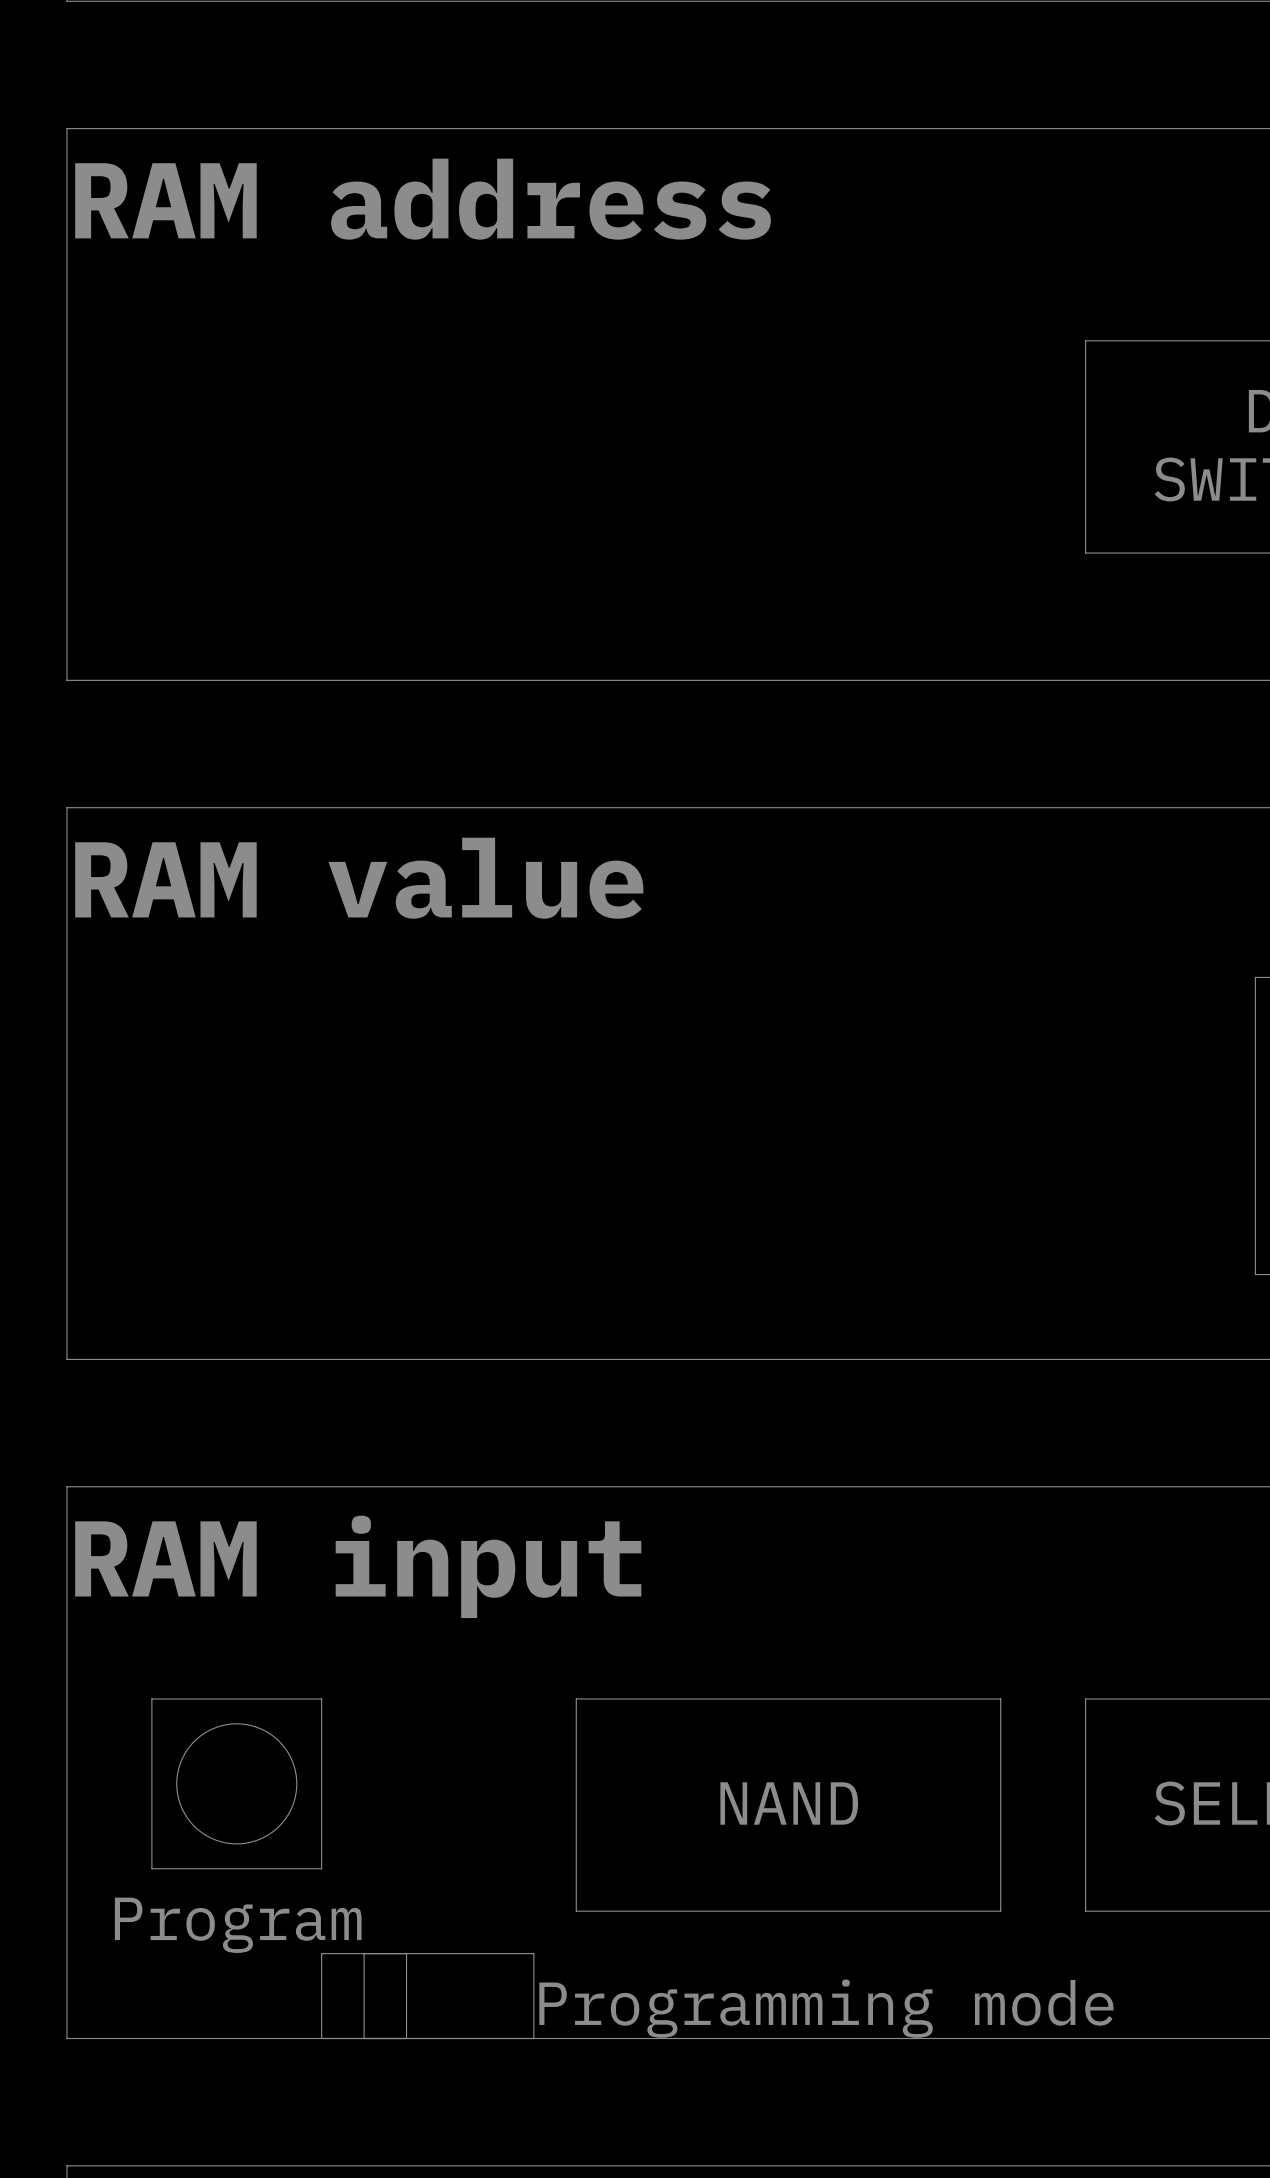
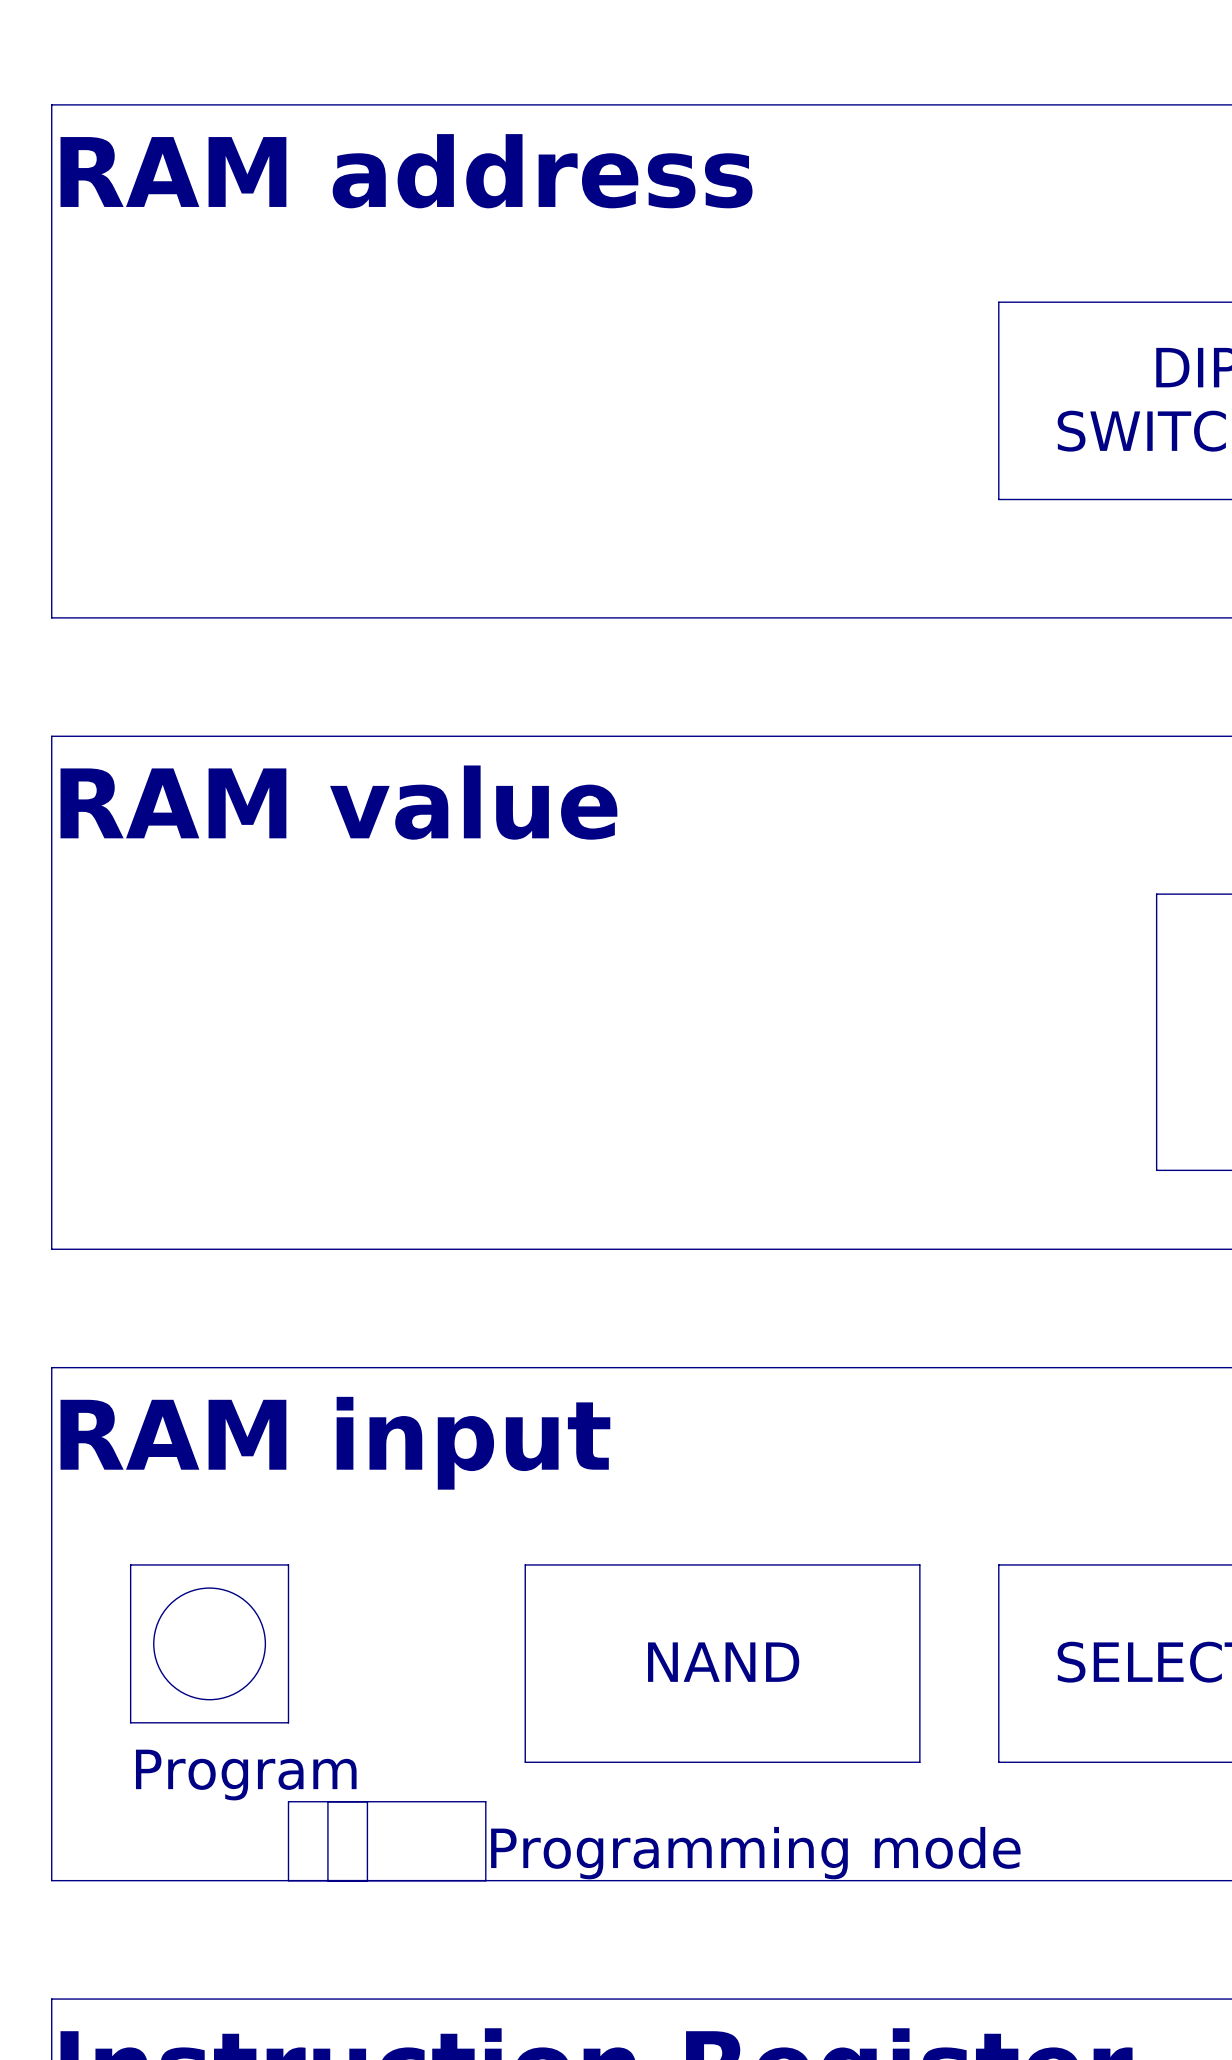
text position: Program (238, 1925) -> Program (246, 1775)

